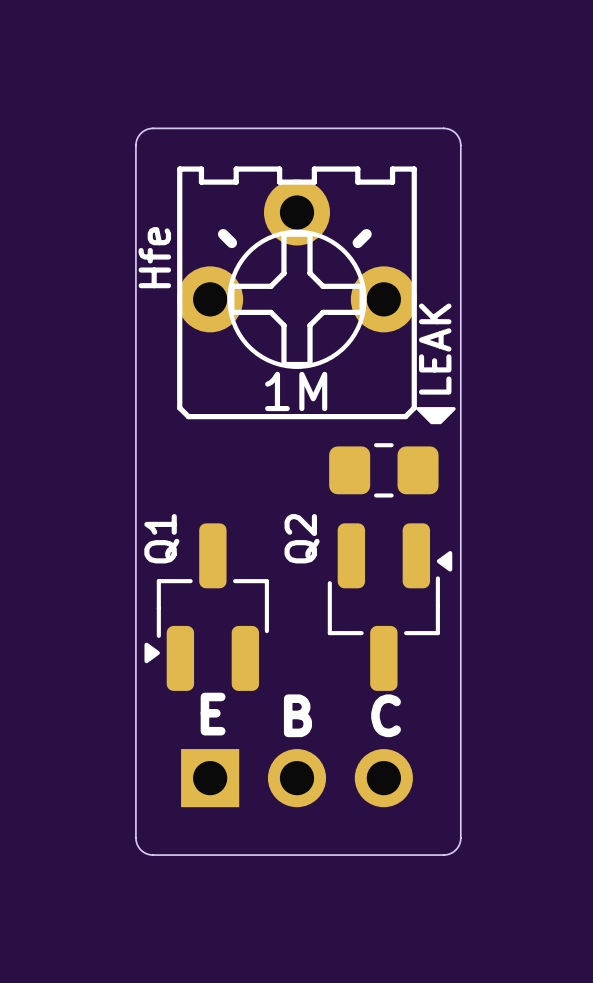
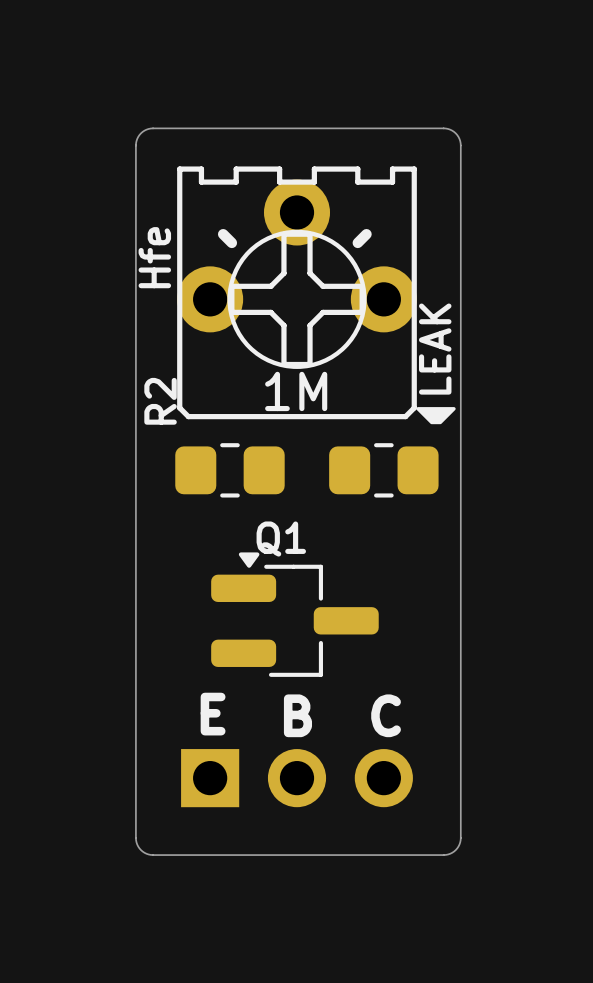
R2: none -> (229, 470)
Q1 rotation: 0° (206, 607) -> 90° clockwise (294, 614)
Q2: (390, 607) -> none

